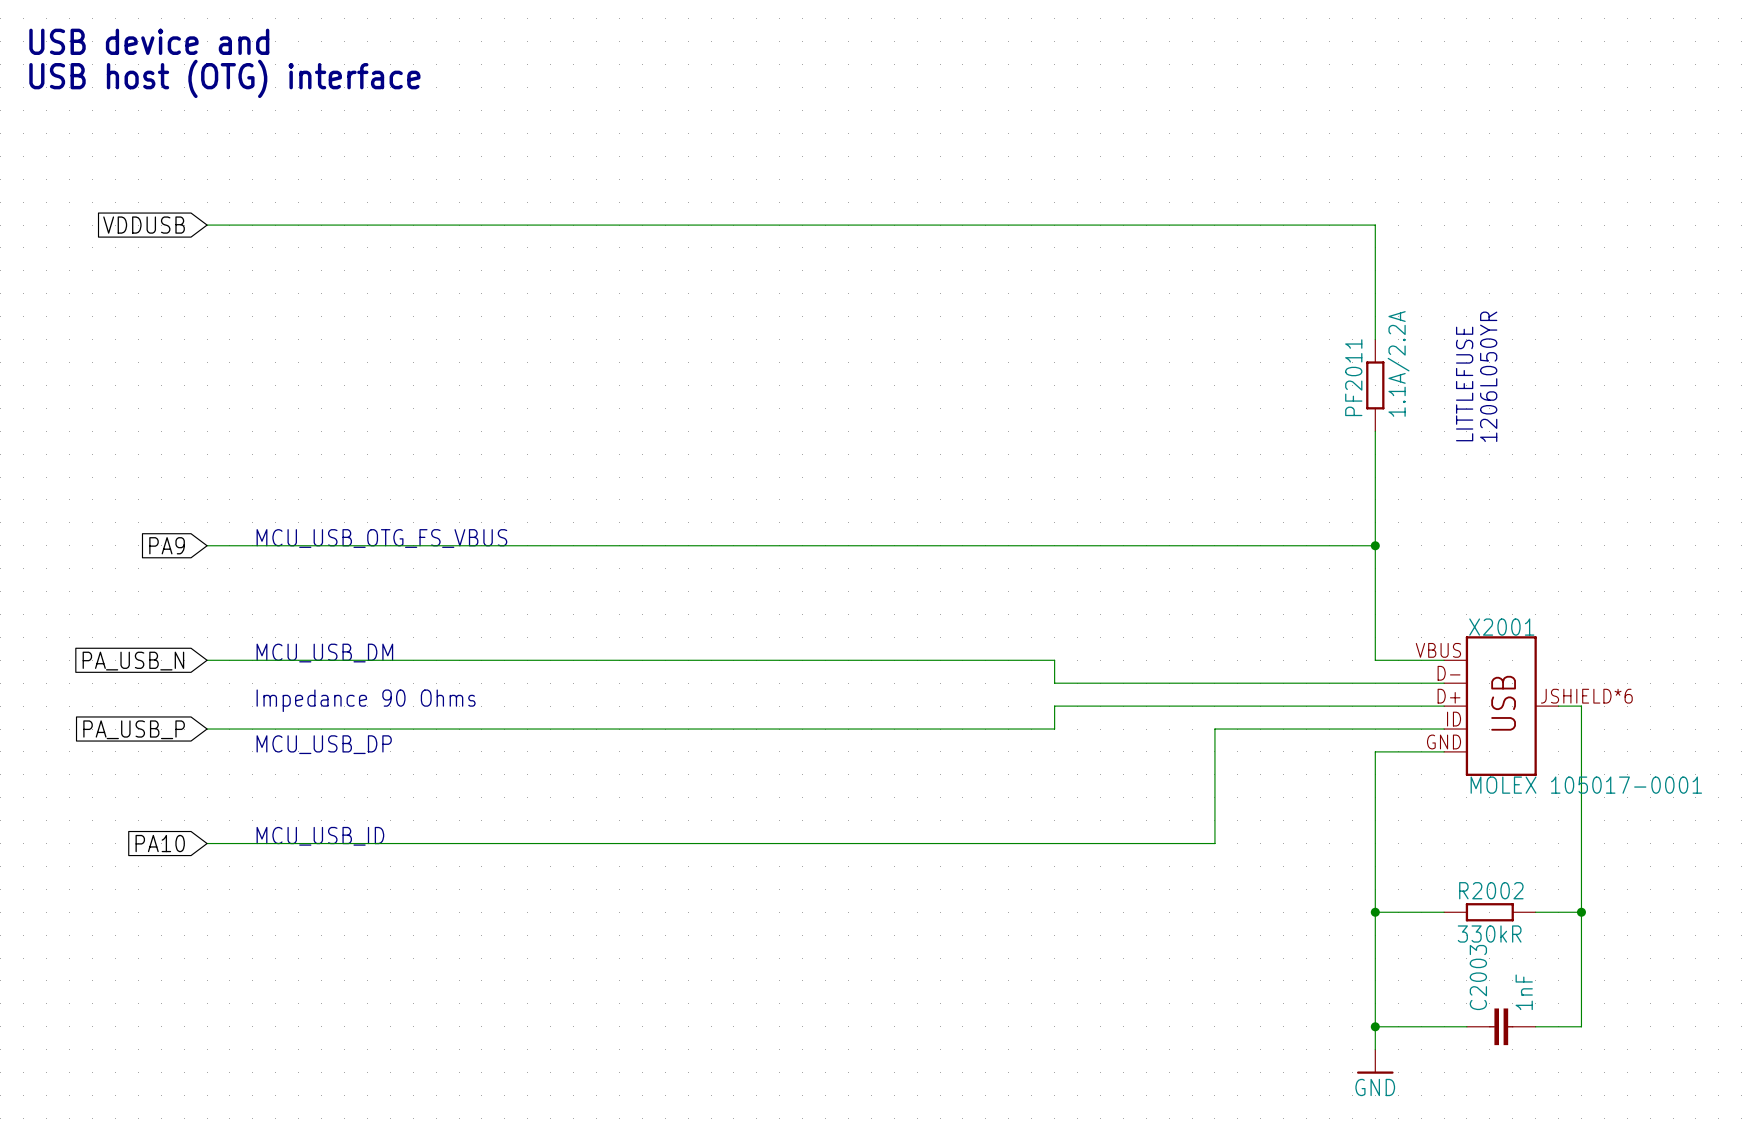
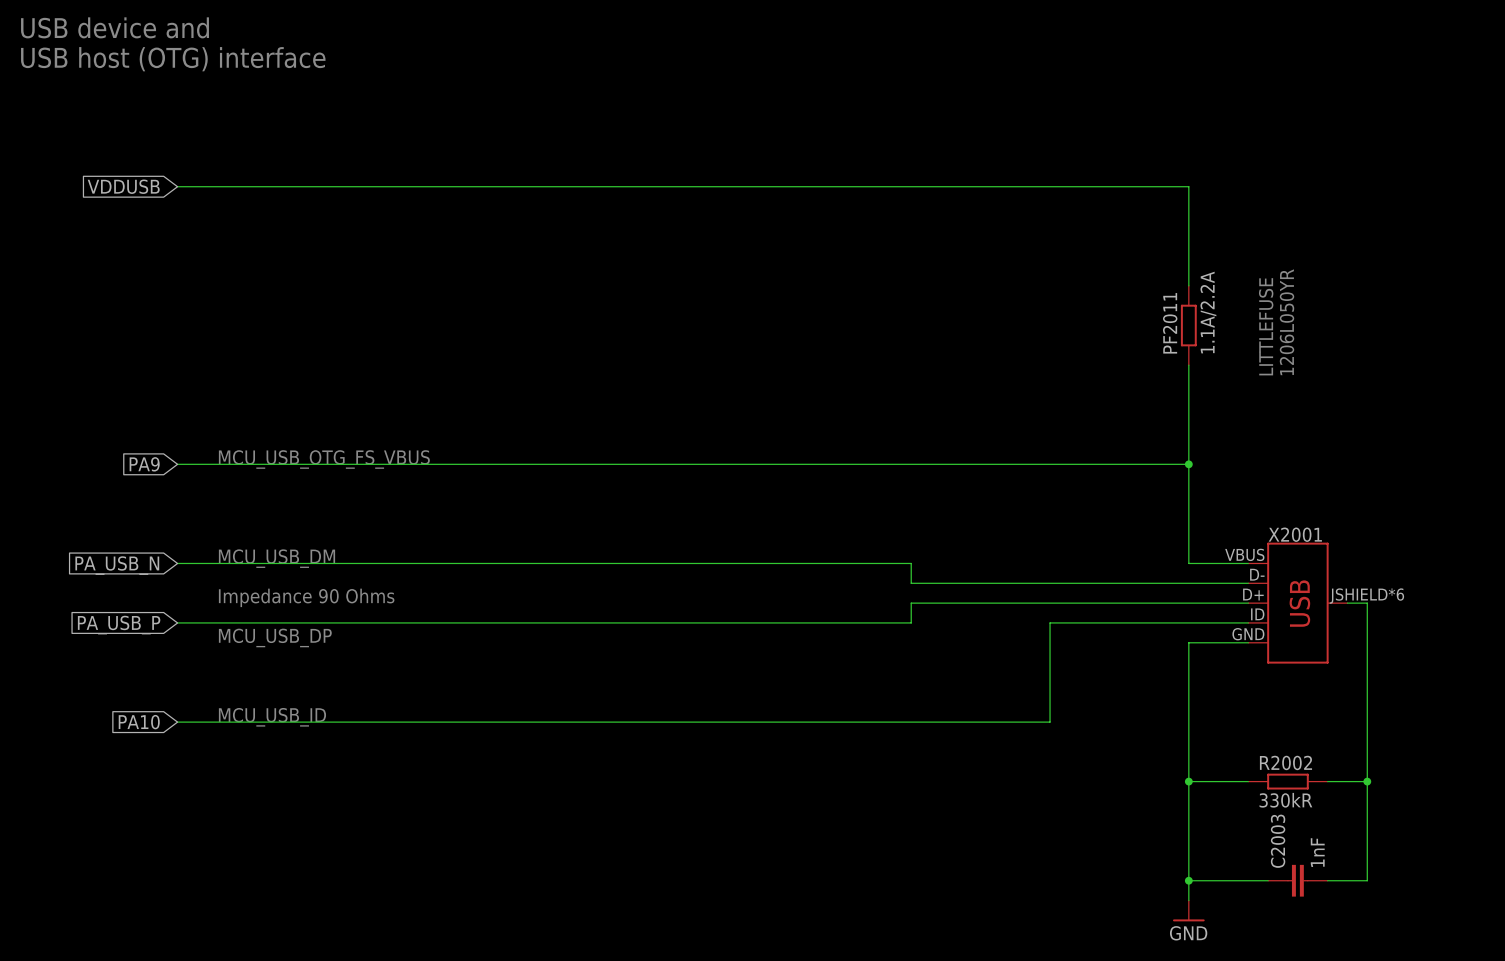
X2001 value: MOLEX 105017-0001 (1586, 785) -> none

